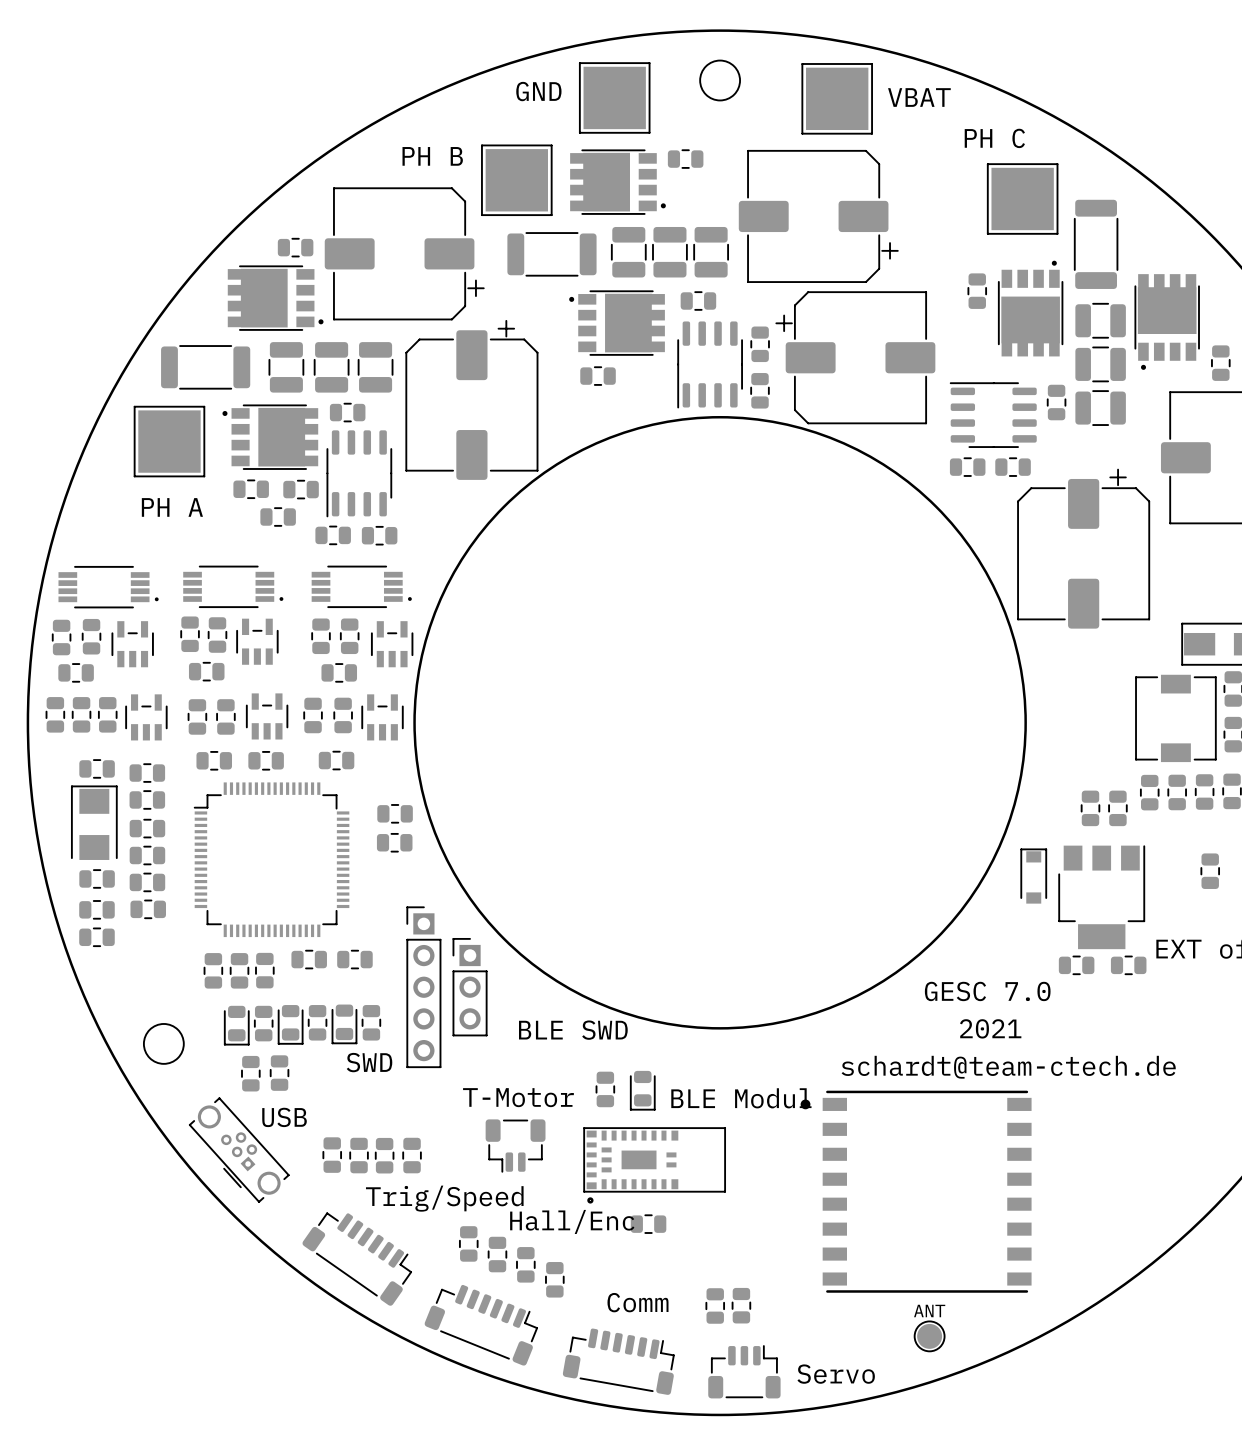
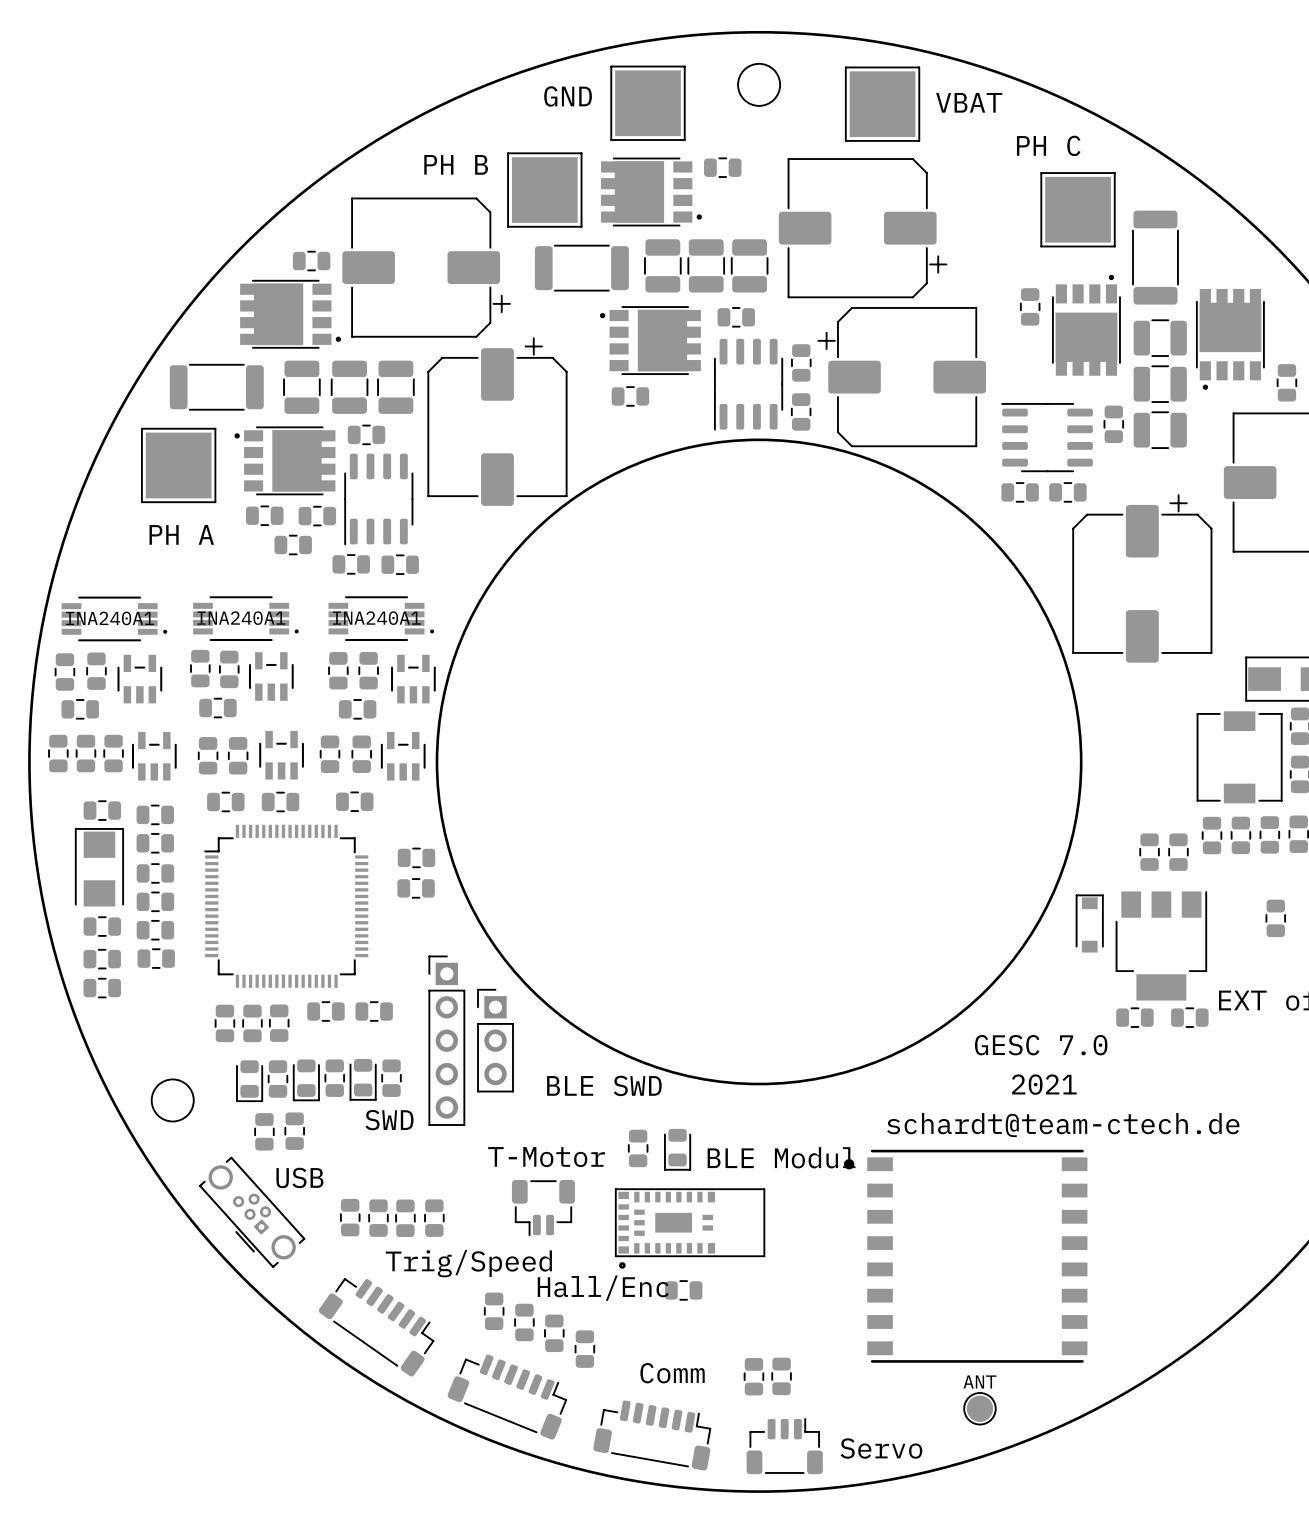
part value: none -> INA240A1 (109, 618)
part value: none -> INA240A1 (241, 618)
part value: none -> INA240A1 (376, 618)

